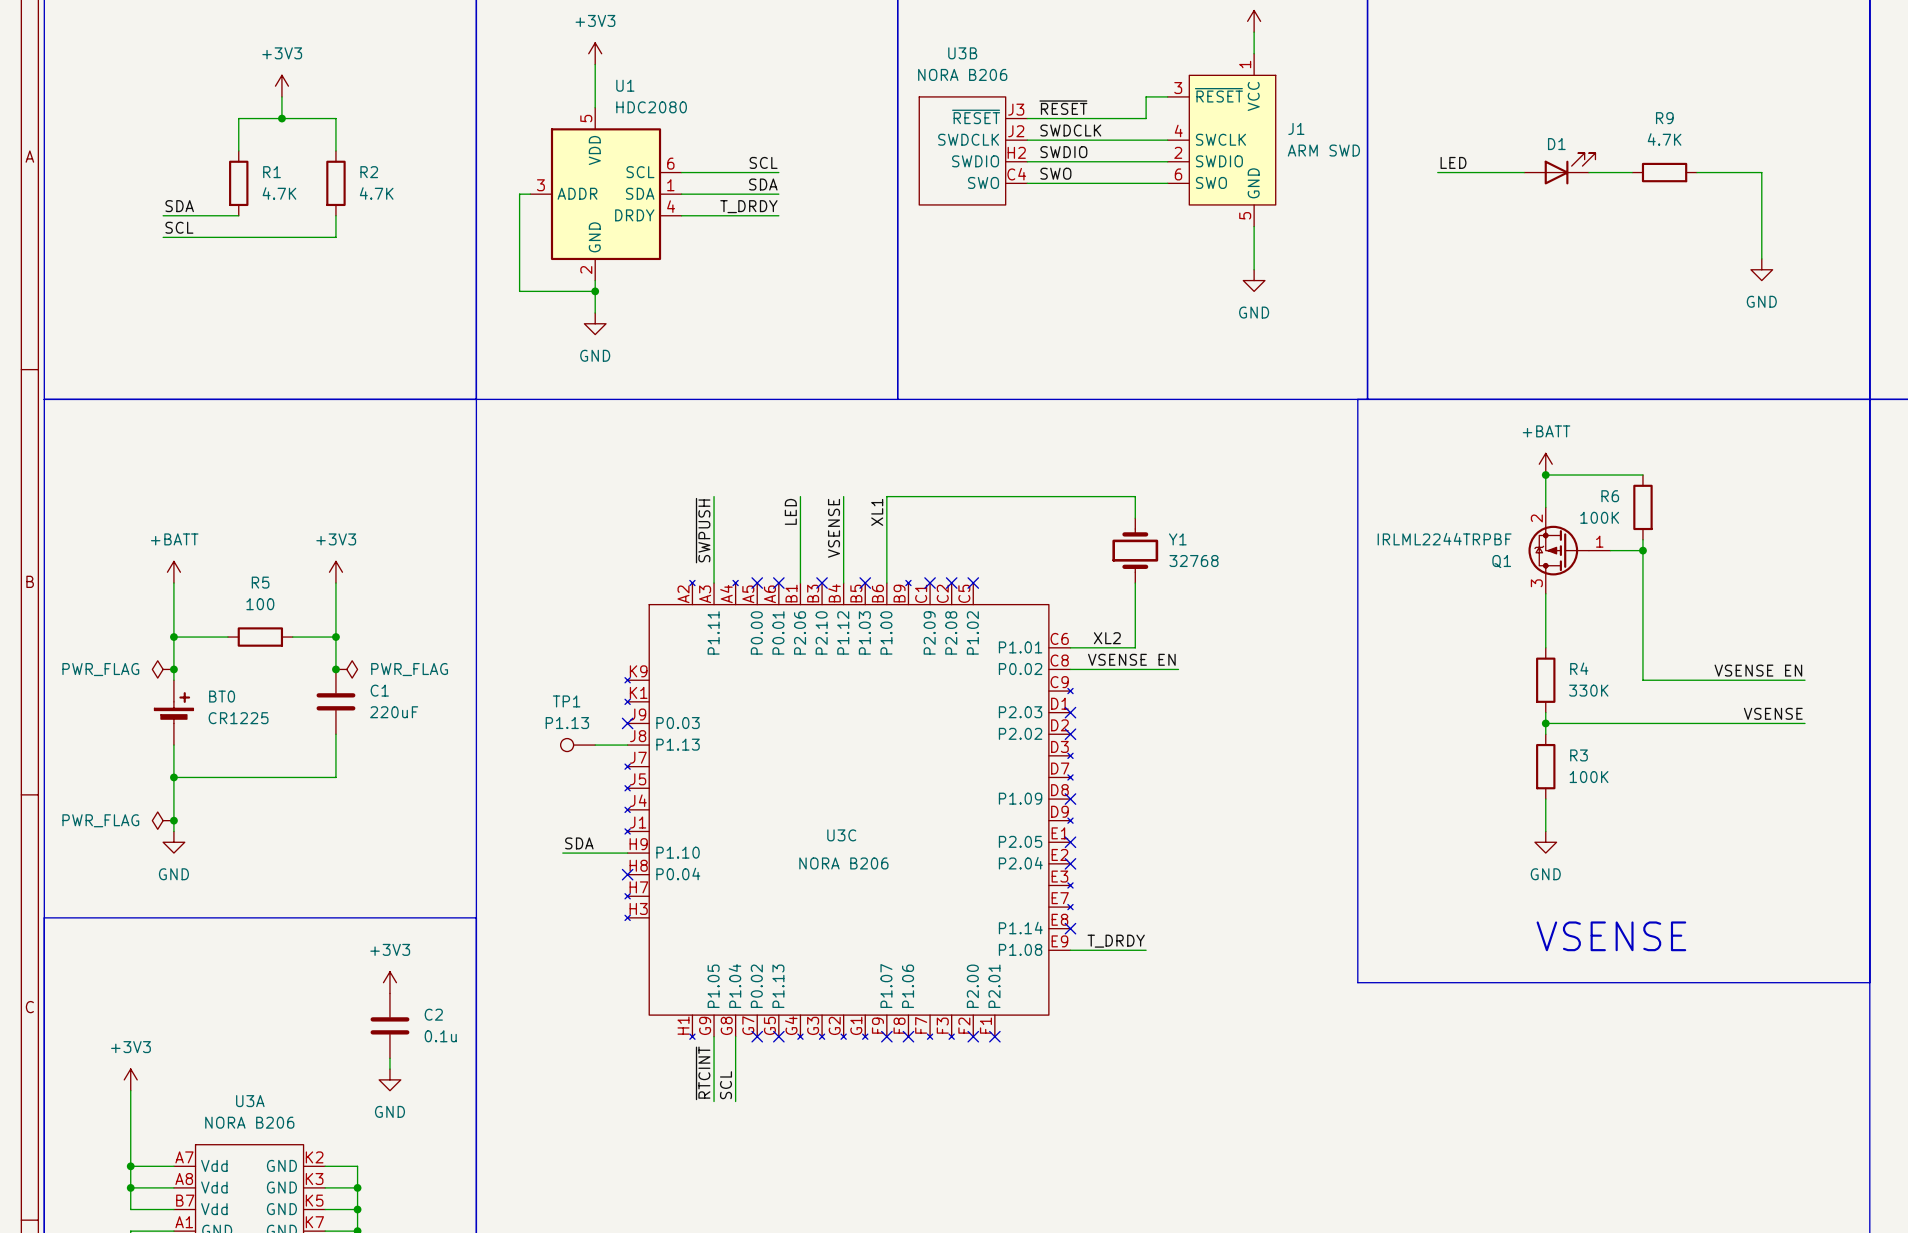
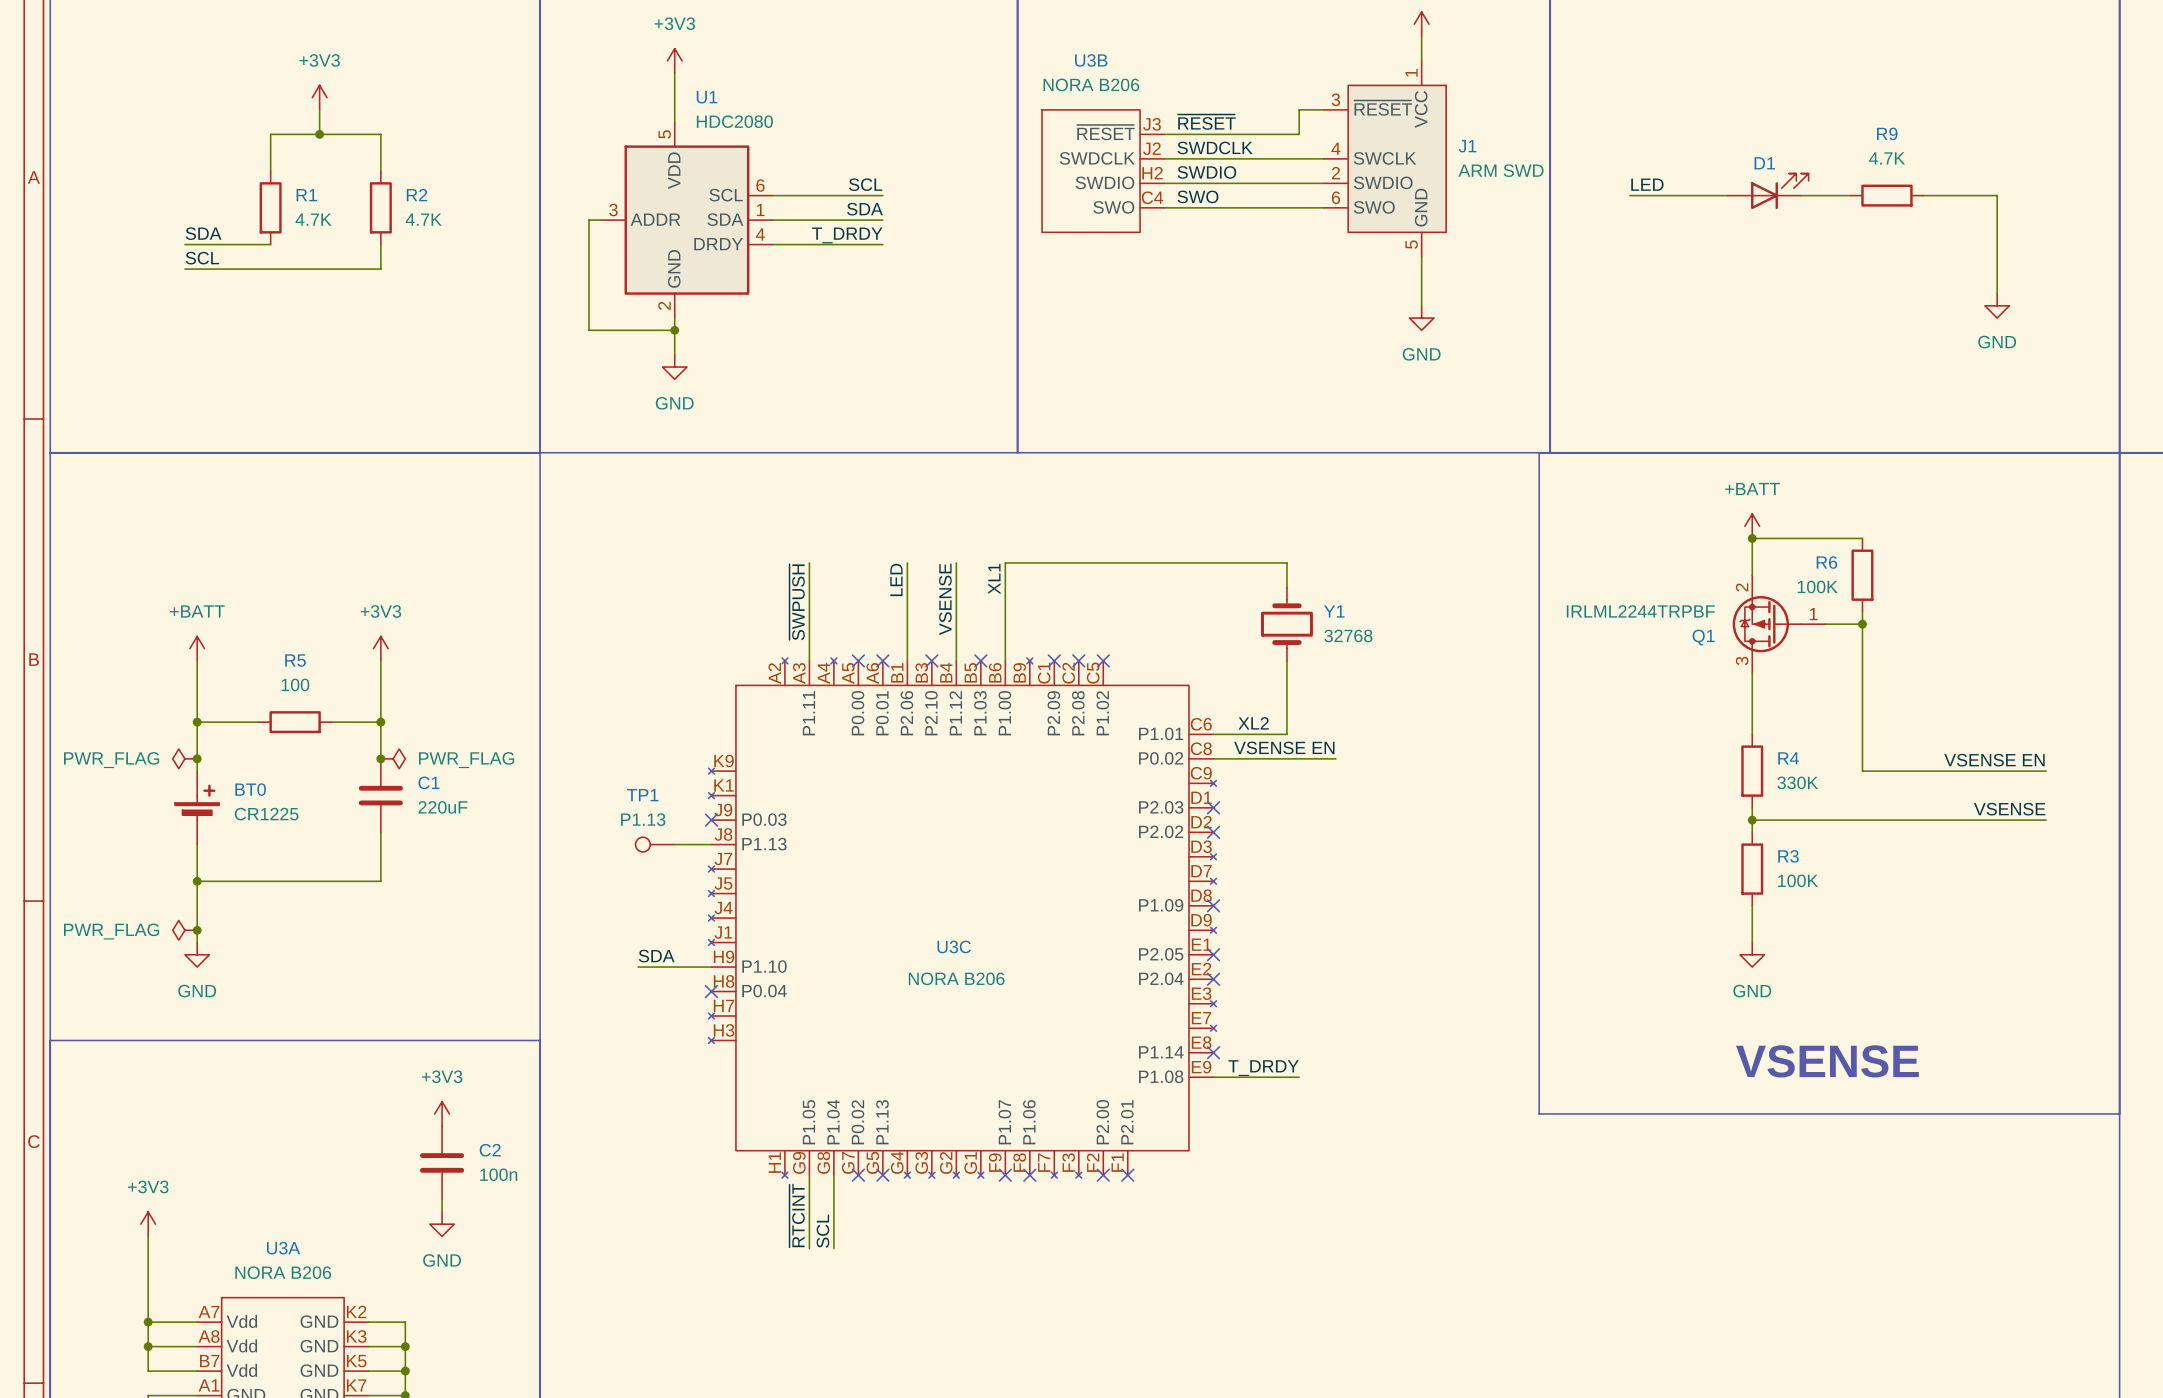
C2 value: 0.1u (440, 1036) -> 100n (498, 1174)

